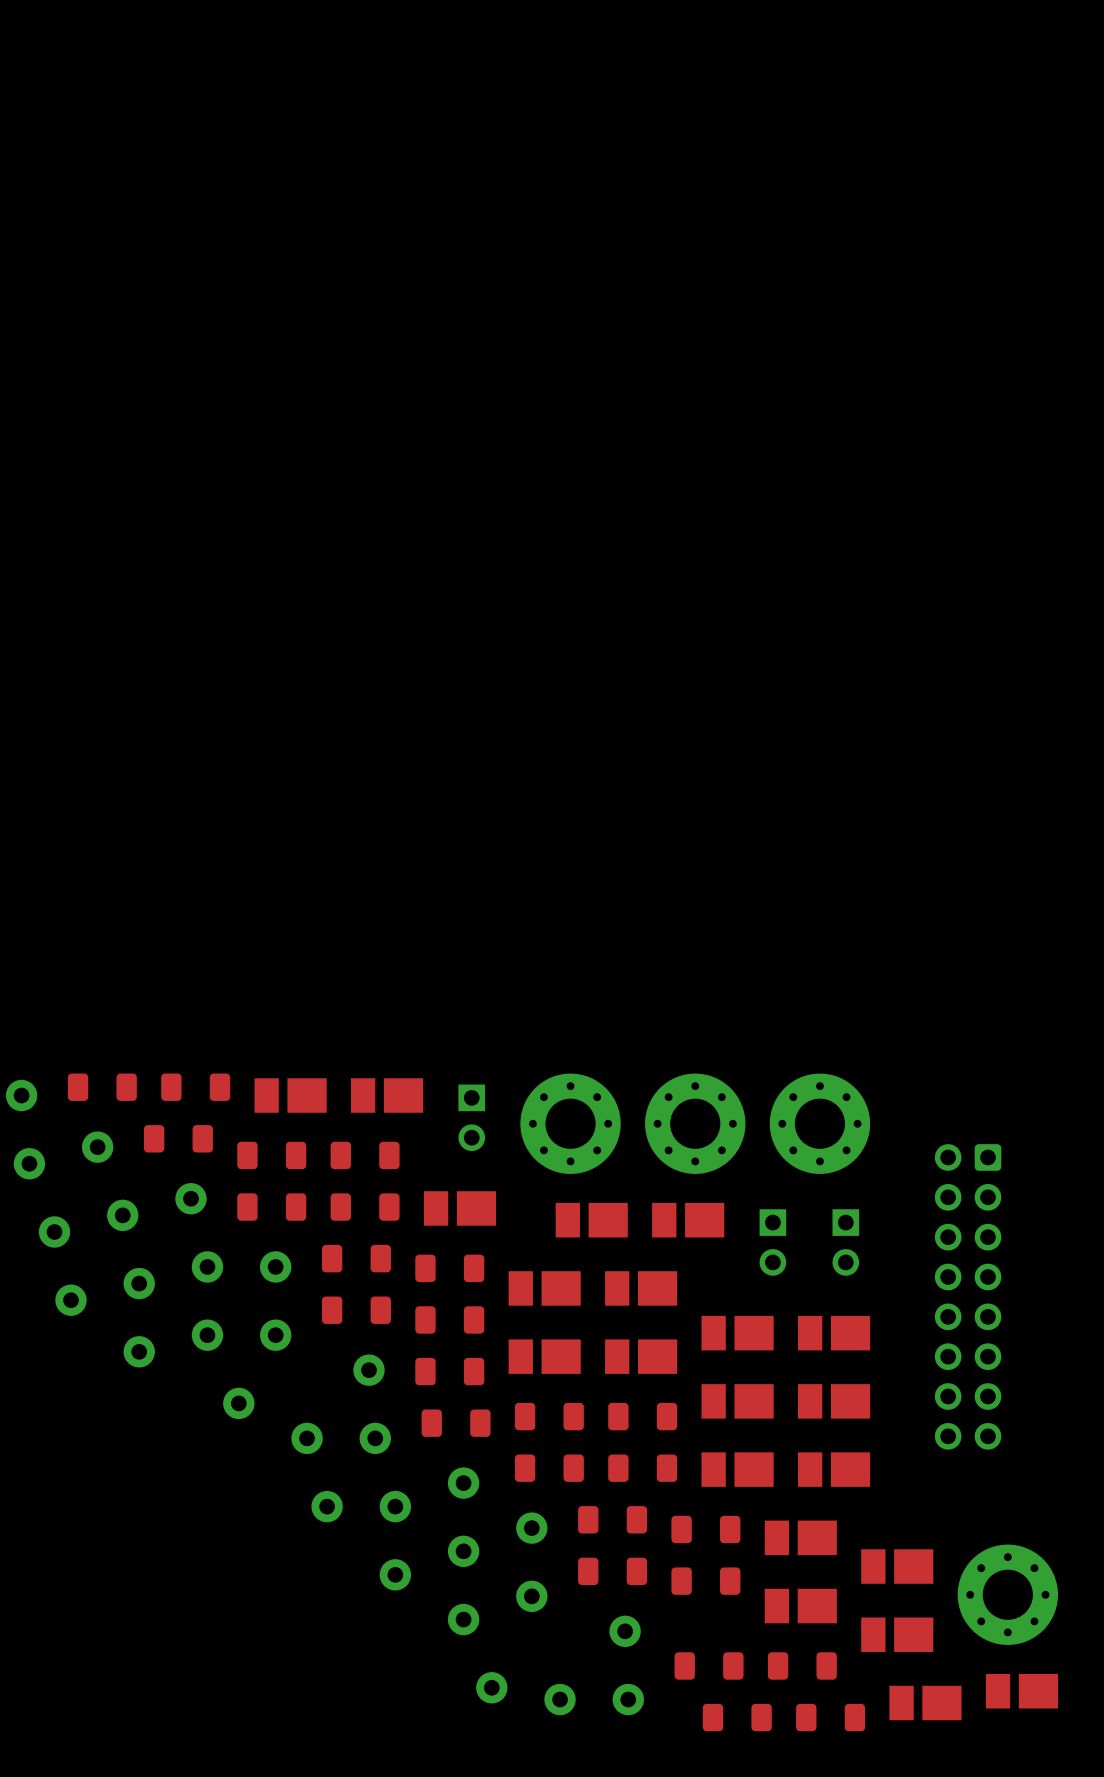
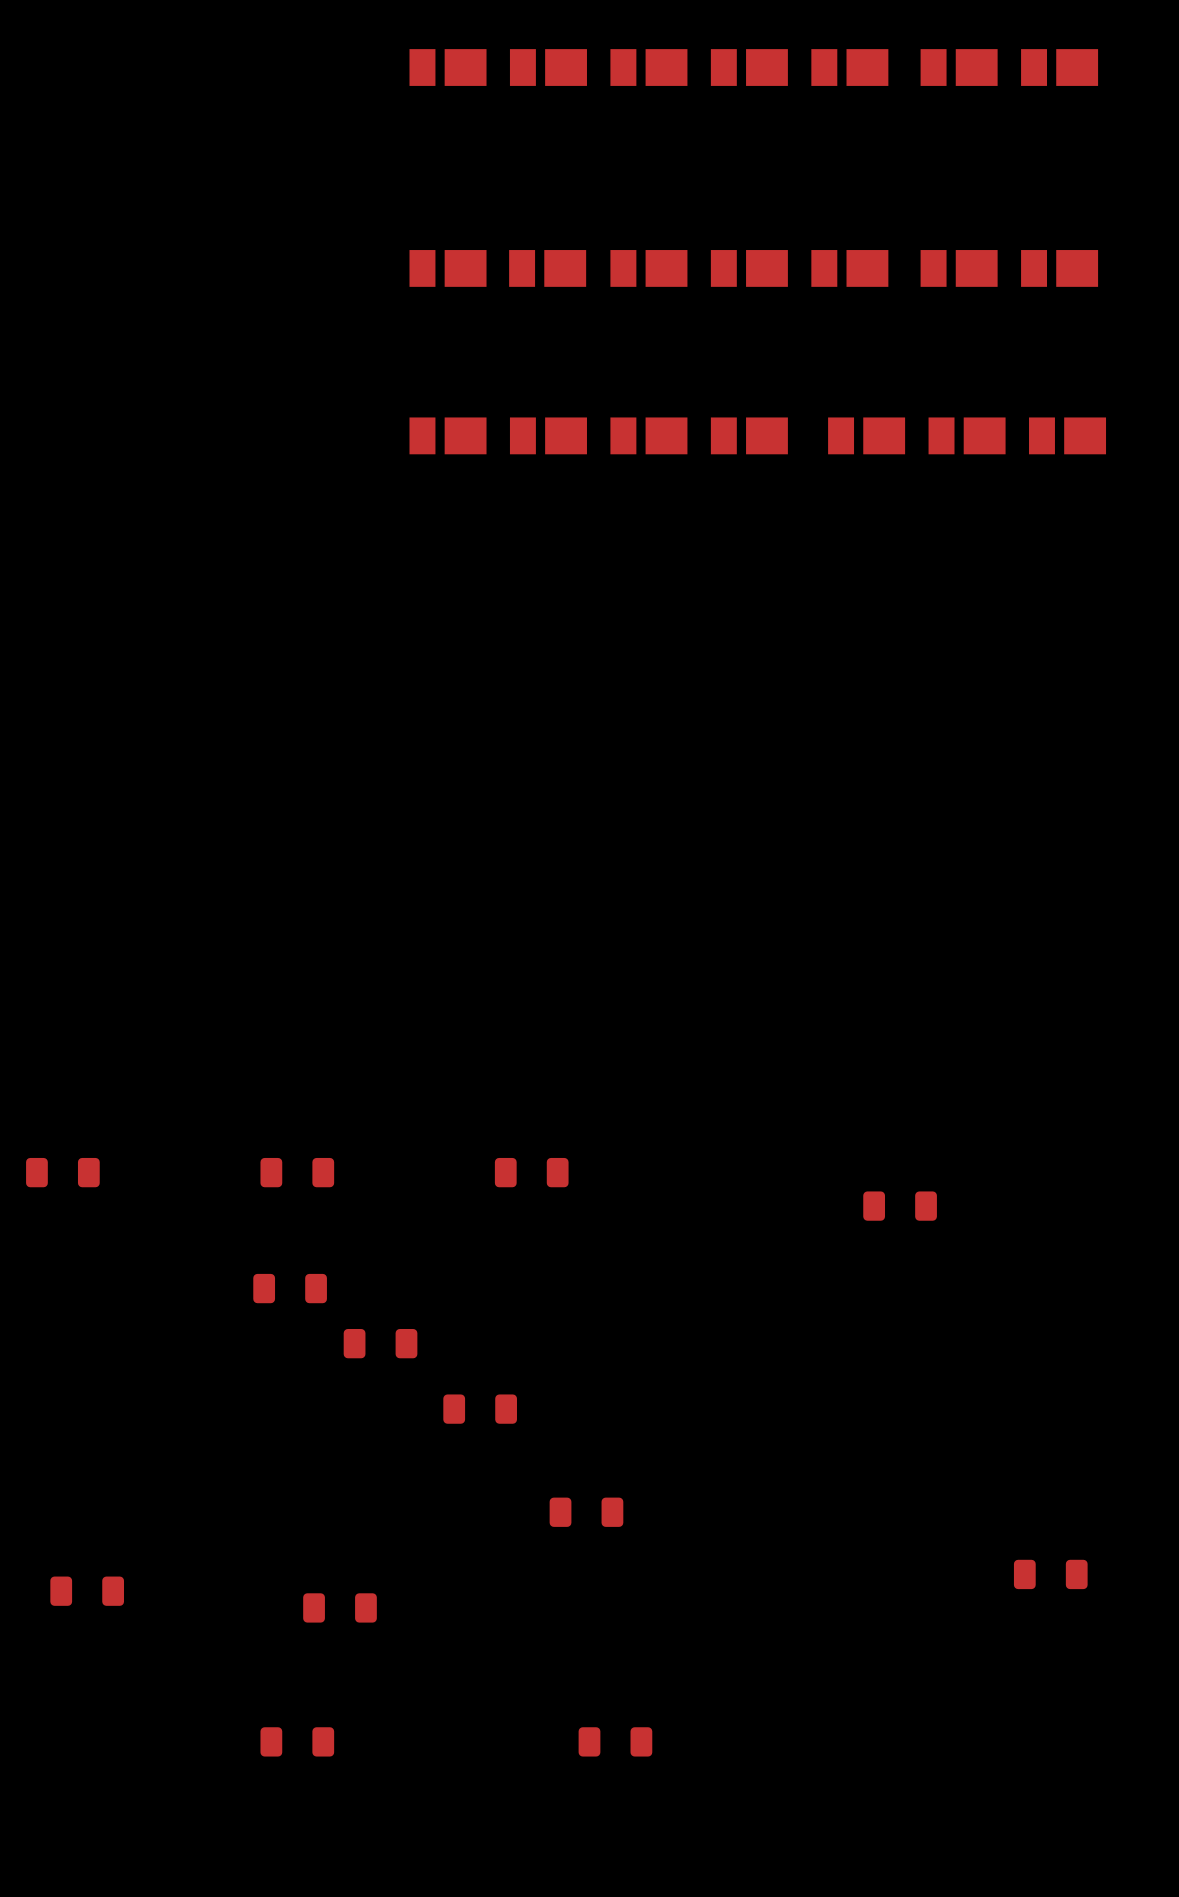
part: none -> (448, 67)
part: none -> (548, 67)
part: none -> (648, 67)
part: none -> (749, 67)
part: none -> (849, 67)
part: none -> (959, 67)
part: none -> (1059, 67)
part: none -> (448, 268)
part: none -> (547, 268)
part: none -> (648, 268)
part: none -> (749, 268)
part: none -> (849, 268)
part: none -> (959, 268)
part: none -> (1059, 268)
part: none -> (448, 435)
part: none -> (548, 435)
part: none -> (648, 435)
part: none -> (749, 435)
part: none -> (866, 435)
part: none -> (967, 435)
part: none -> (1067, 435)
part footprint: [254, 1078, 327, 1113] -> [260, 1157, 335, 1188]
part position: (102, 1087) -> (62, 1172)
part: (195, 1087) -> none
part: (21, 1095) -> none
part: (387, 1095) -> none
part: none -> (531, 1172)
part: (471, 1117) -> none
part: (570, 1123) -> none
part: (695, 1123) -> none
part: (819, 1123) -> none
part: none -> (900, 1206)
part: (178, 1138) -> none
part: (97, 1147) -> none
part: (271, 1155) -> none
part: (365, 1155) -> none
part: (29, 1163) -> none
part: (190, 1198) -> none
part: (365, 1207) -> none
part: (459, 1208) -> none
part: (122, 1215) -> none
part: (591, 1220) -> none
part: (688, 1220) -> none
part: (54, 1231) -> none
part: (772, 1242) -> none
part: (845, 1242) -> none
part: (207, 1266) -> none
part: (275, 1266) -> none
part: (449, 1268) -> none
part: (139, 1283) -> none
part: (544, 1288) -> none
part: (641, 1288) -> none
part: (968, 1296) -> none
part: (70, 1300) -> none
part: (356, 1310) -> none
part: (737, 1333) -> none
part: (834, 1333) -> none
part: (207, 1335) -> none
part: (275, 1335) -> none
part: (139, 1351) -> none
part: (544, 1356) -> none
part: (641, 1356) -> none
part: (369, 1370) -> none
part: (449, 1371) -> none
part: (737, 1401) -> none
part: (834, 1401) -> none
part: (238, 1403) -> none
part: (642, 1416) -> none
part: (456, 1423) -> none
part: (307, 1438) -> none
part: (375, 1438) -> none
part: (549, 1468) -> none
part: (642, 1468) -> none
part: (737, 1469) -> none
part: (834, 1469) -> none
part: none -> (1050, 1574)
part: (463, 1483) -> none
part: none -> (87, 1591)
part footprint: [311, 1490, 343, 1523] -> [303, 1593, 377, 1623]
part: (395, 1506) -> none
part: (612, 1519) -> none
part: (531, 1528) -> none
part: (705, 1529) -> none
part: (800, 1537) -> none
part: (463, 1551) -> none
part: (897, 1566) -> none
part: (612, 1571) -> none
part: (395, 1574) -> none
part: (705, 1581) -> none
part: (1007, 1594) -> none
part: (531, 1596) -> none
part: (800, 1606) -> none
part: (463, 1619) -> none
part: none -> (297, 1741)
part: none -> (615, 1741)
part: (625, 1631) -> none
part: (897, 1634) -> none
part: (709, 1665) -> none
part: (802, 1665) -> none
part: (491, 1687) -> none
part: (1021, 1691) -> none
part: (560, 1699) -> none
part: (628, 1699) -> none
part: (925, 1702) -> none
part: (737, 1717) -> none
part: (830, 1717) -> none

